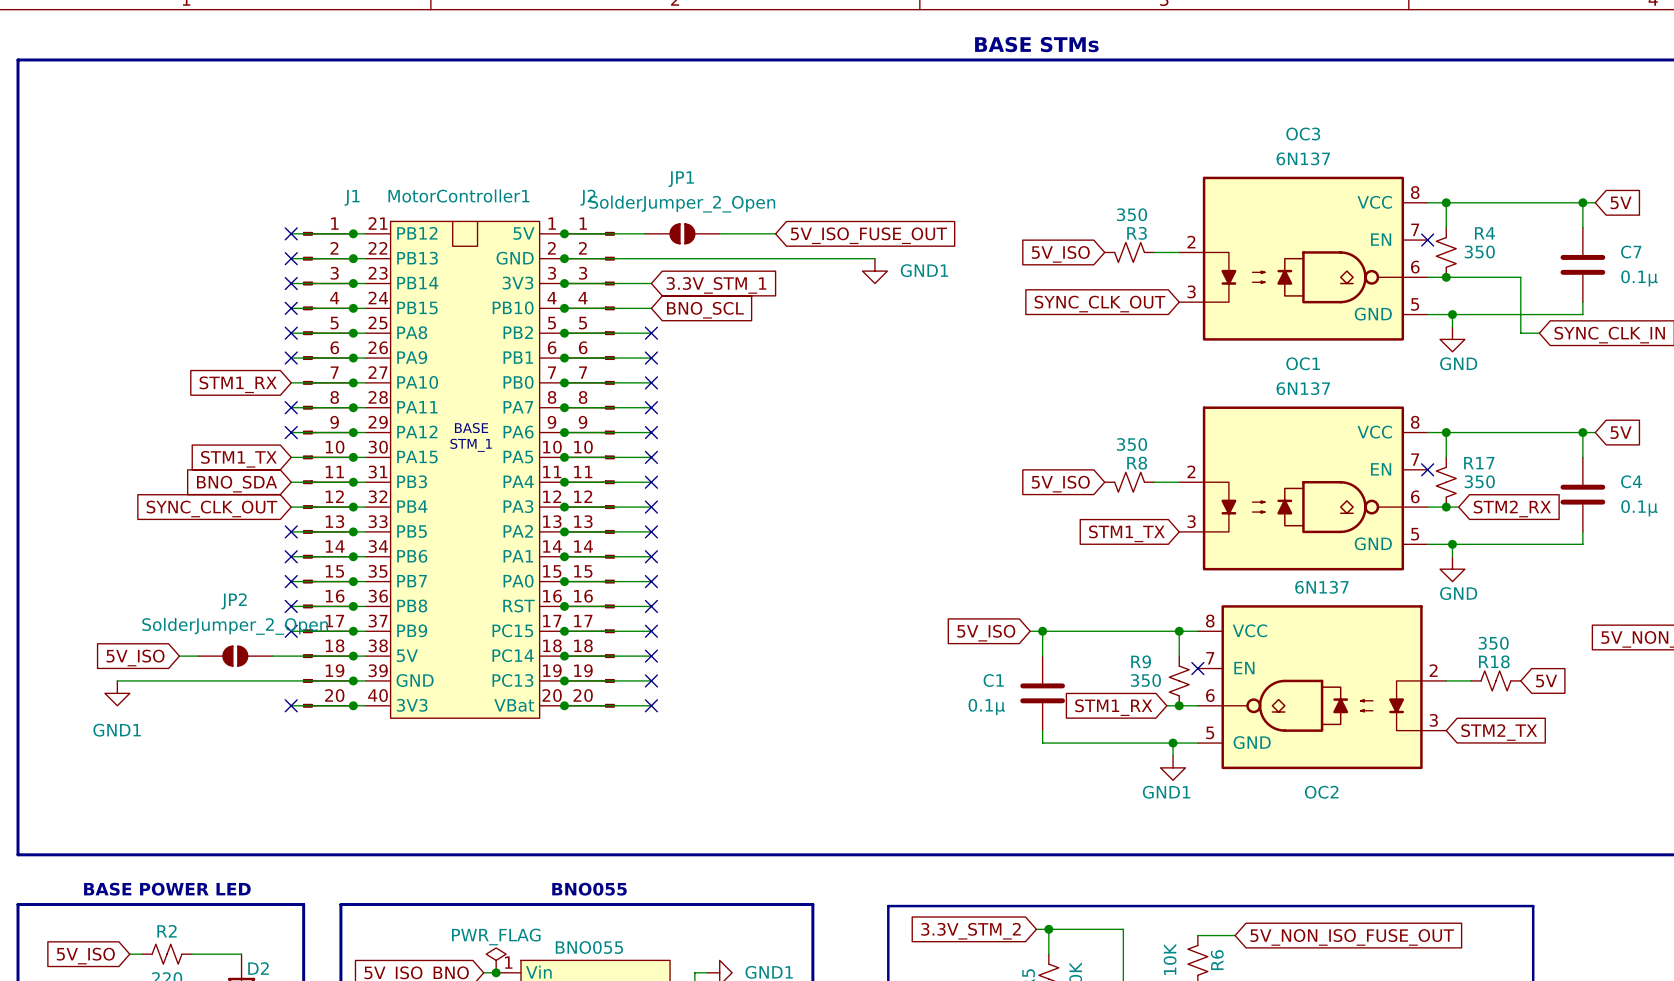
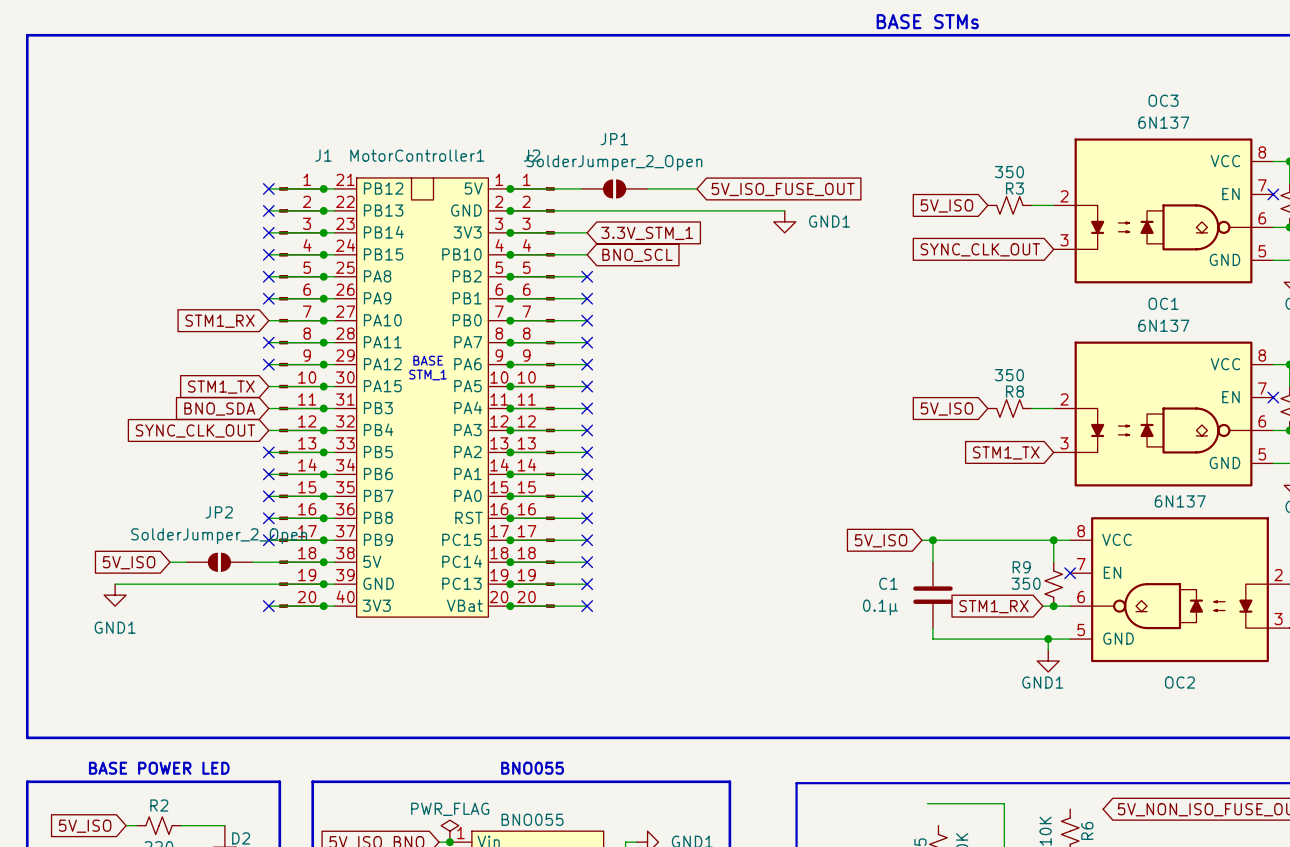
wire: (1048, 929) (1048, 954) -> none
junction: (1048, 929) -> none
global label: 3.3V_STM_2 (970, 931) -> none
wire: (1197, 935) (1235, 935) -> none

